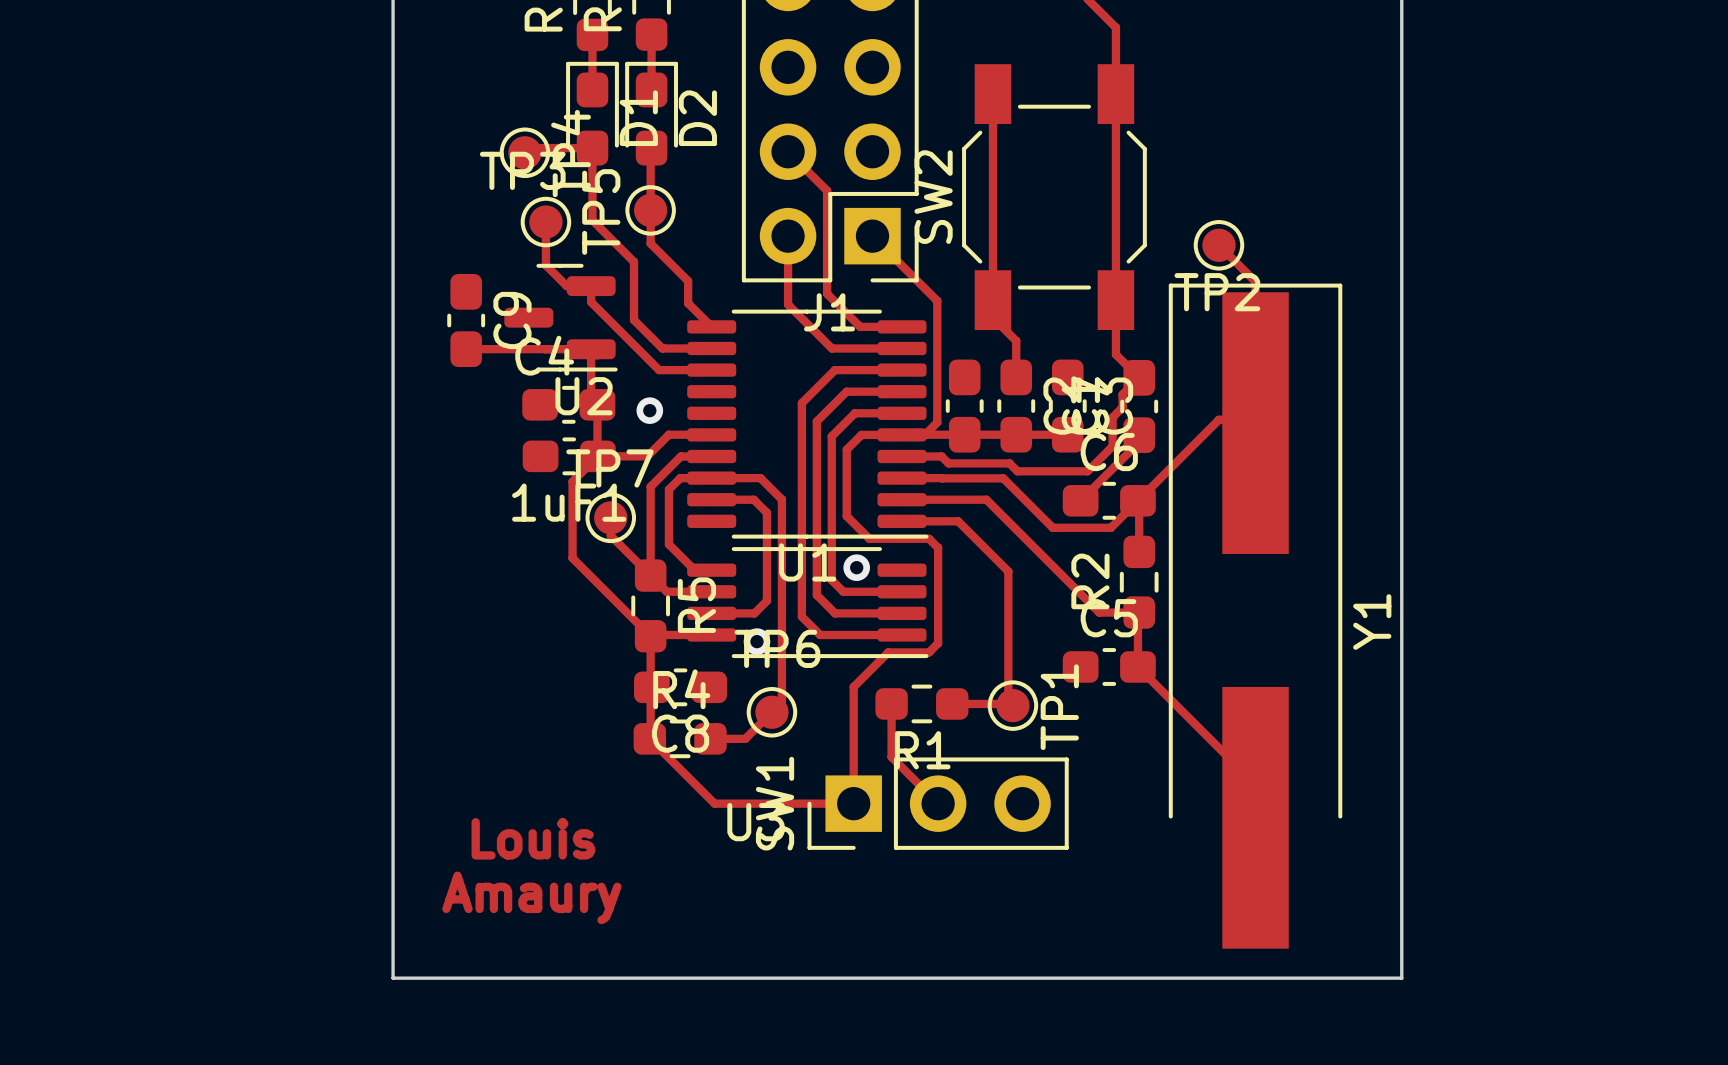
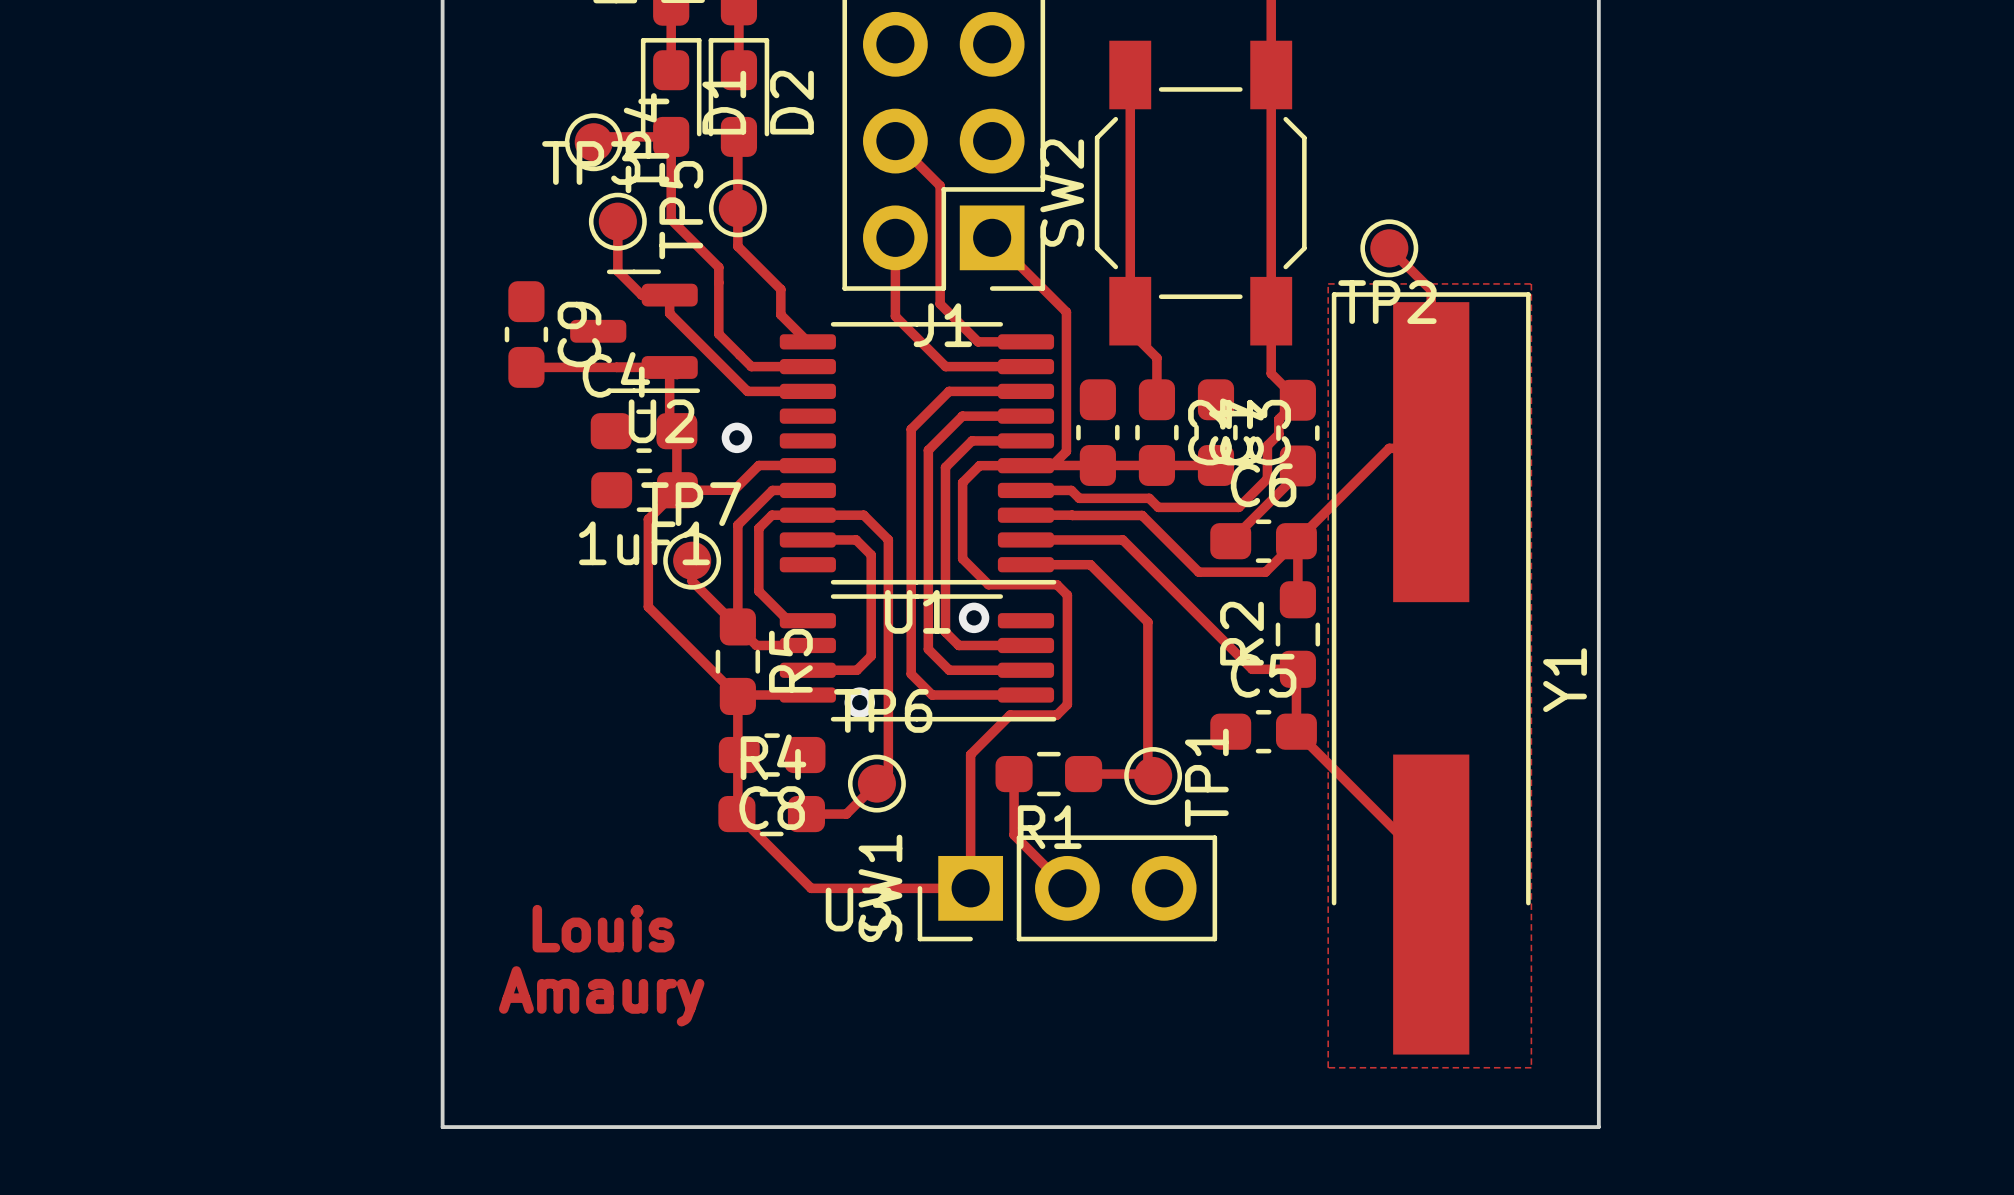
zone outline: none -> (1328, 283) (1328, 1067) (1531, 1067) (1531, 283) (1328, 283)
board edge: (393, 978) (1401, 978) -> (442, 1088) (442, 1127) (1598, 1127) (1598, 1088)

